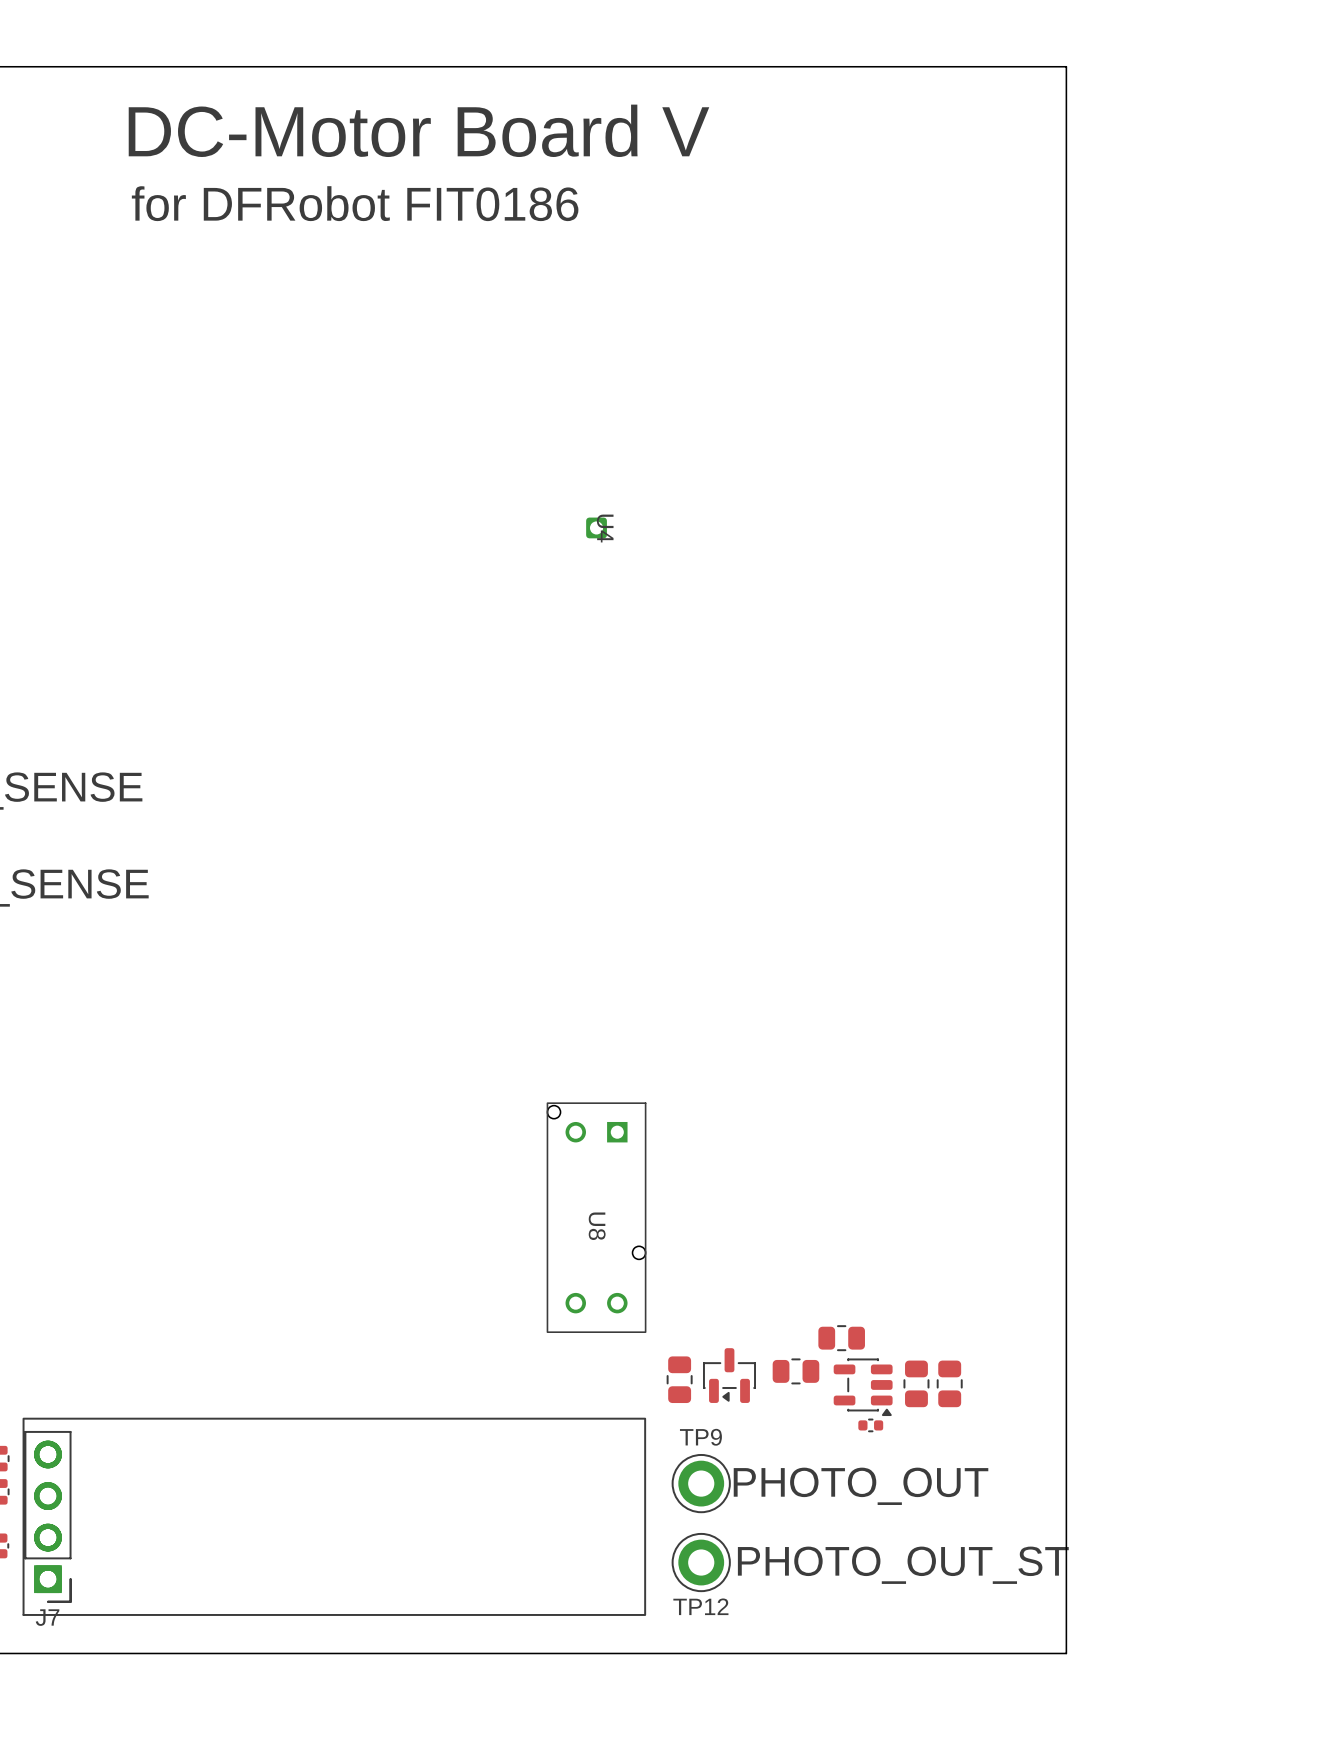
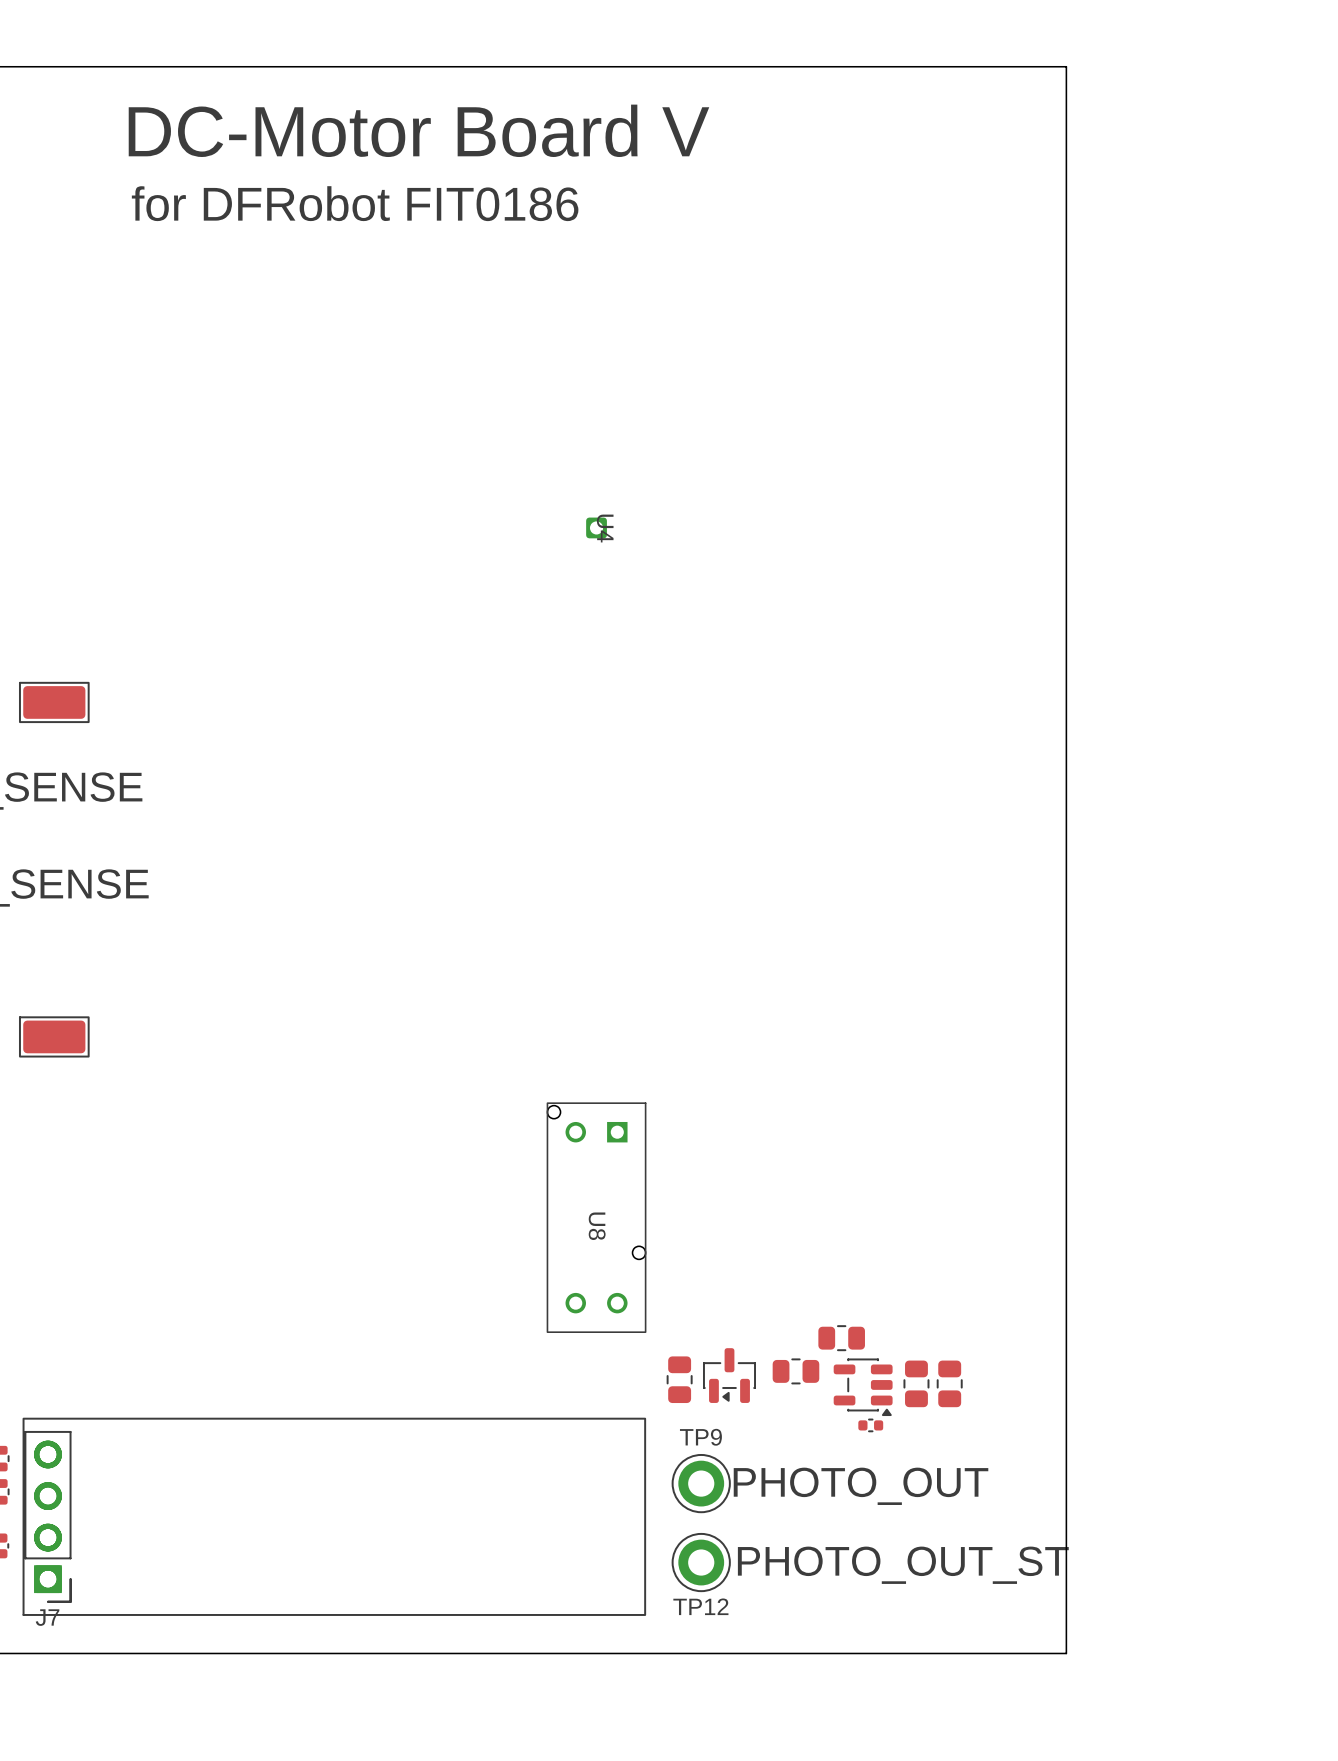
part: none -> (54, 702)
part: none -> (54, 1036)

